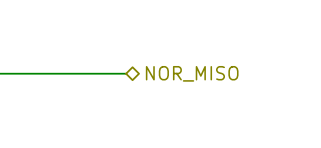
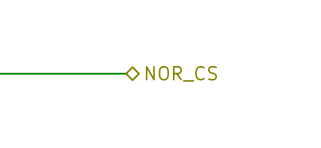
hierarchical label: NOR_MISO (192, 73) -> NOR_CS (181, 73)

